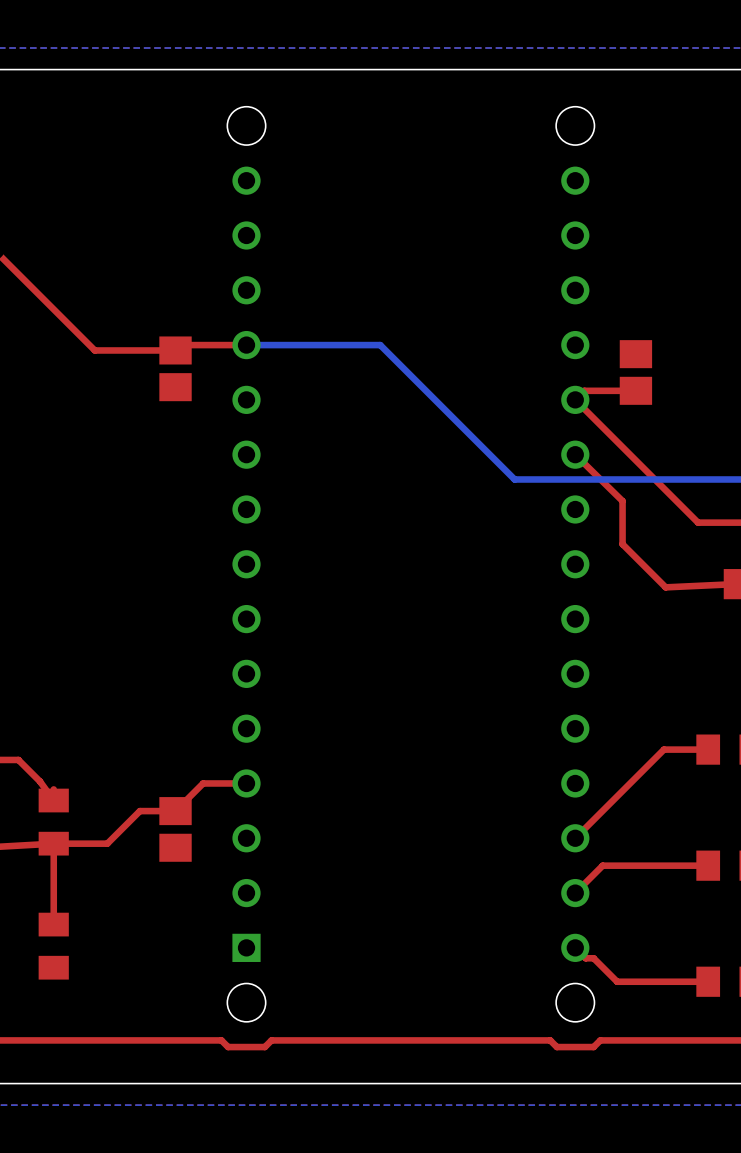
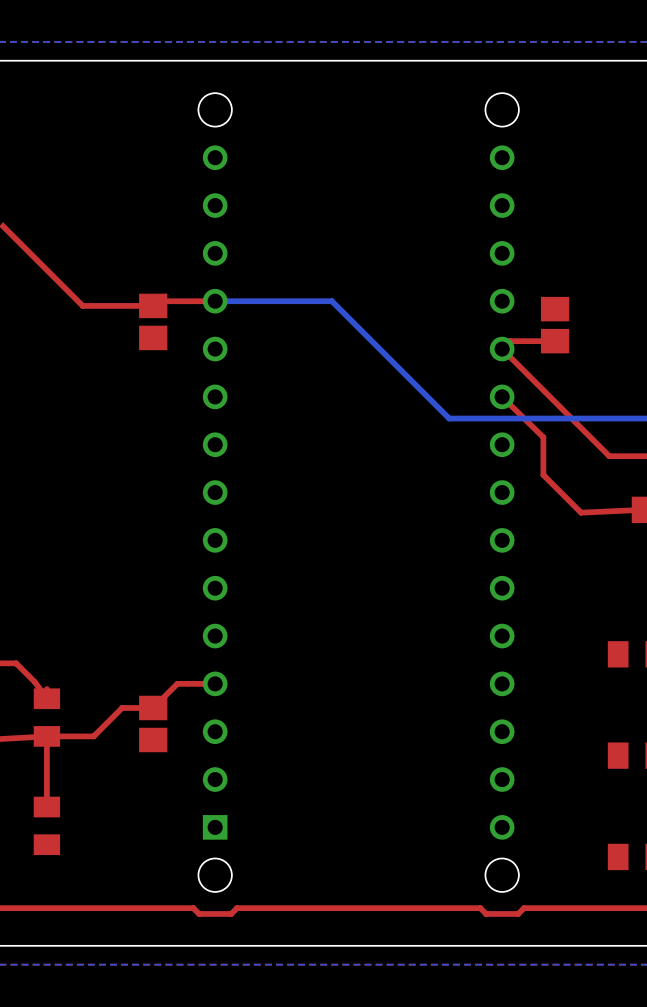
top track: (708, 749) (663, 749) (575, 838) -> none
top track: (708, 865) (602, 865) (575, 893) -> none
top track: (575, 947) (585, 958) (593, 958) (617, 981) (708, 981) -> none

